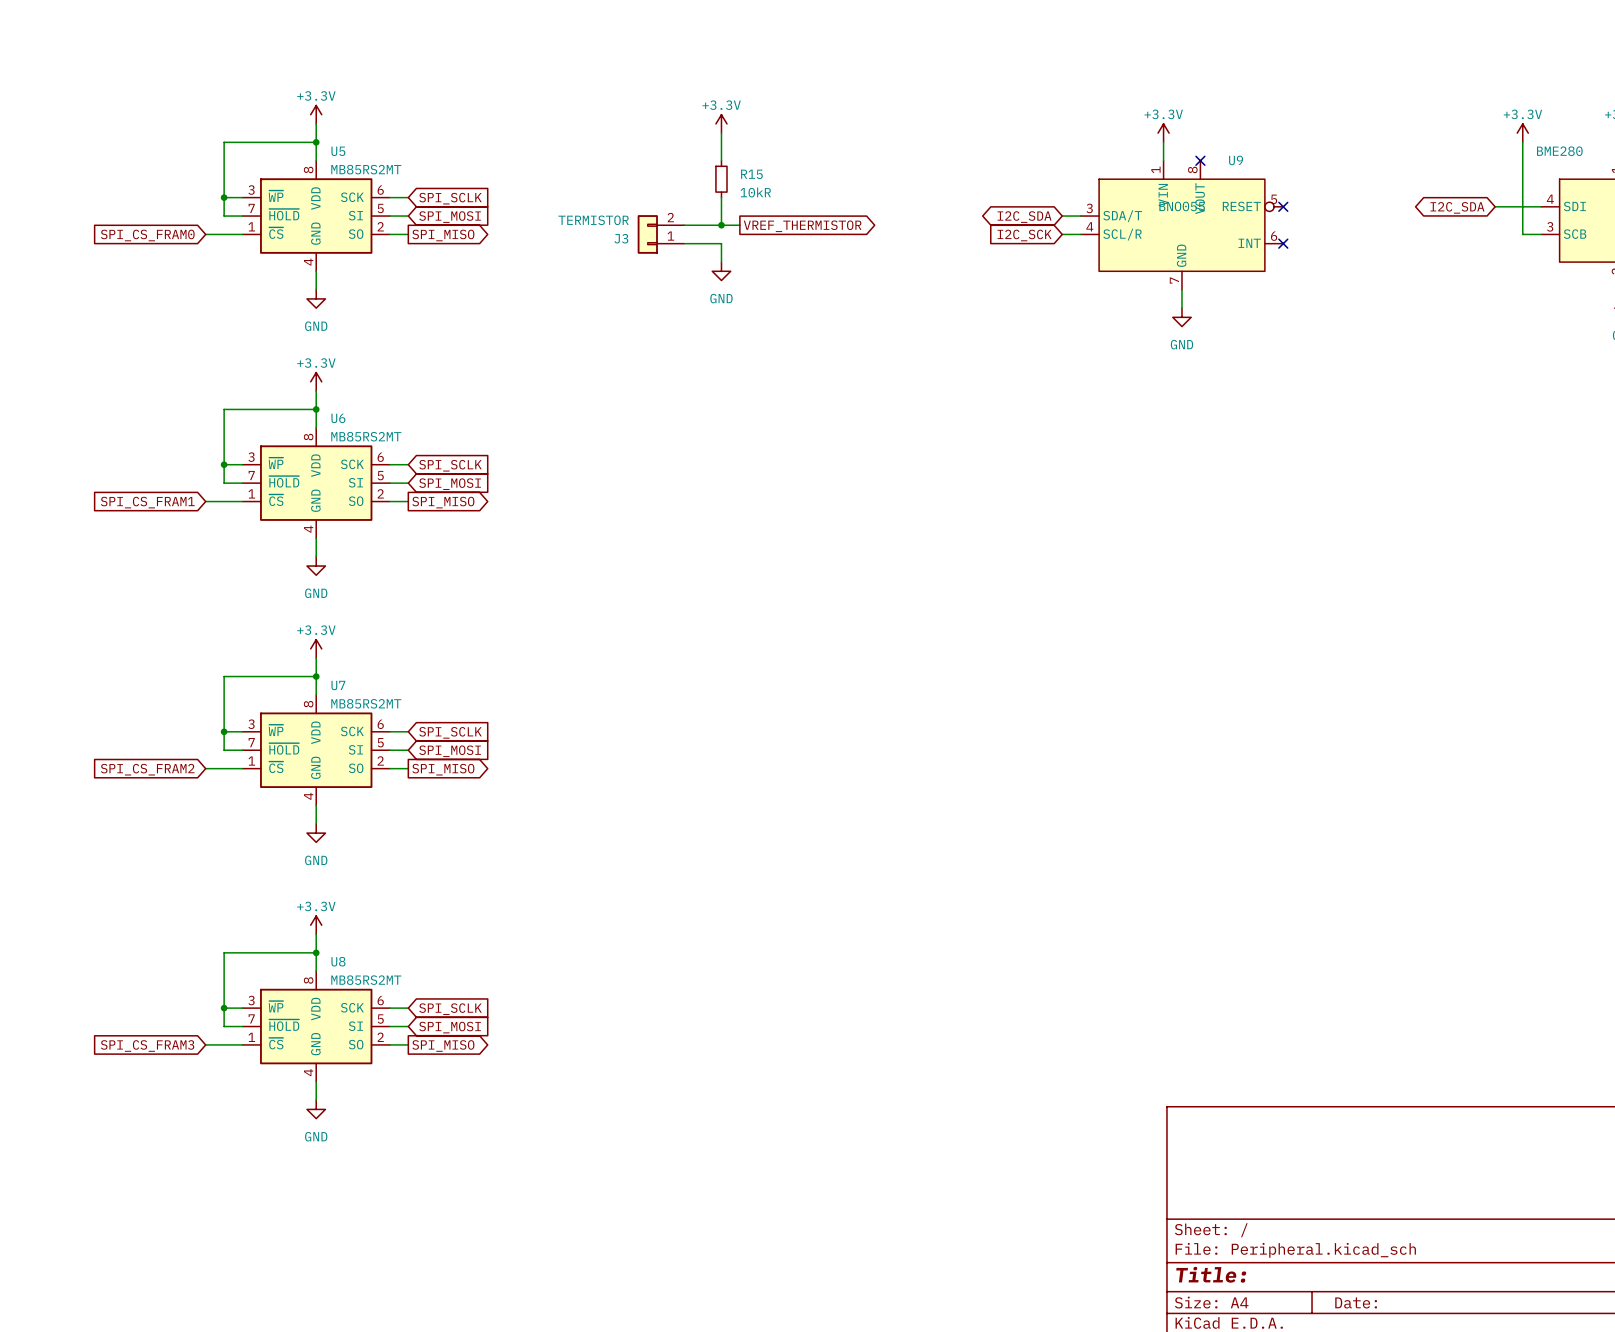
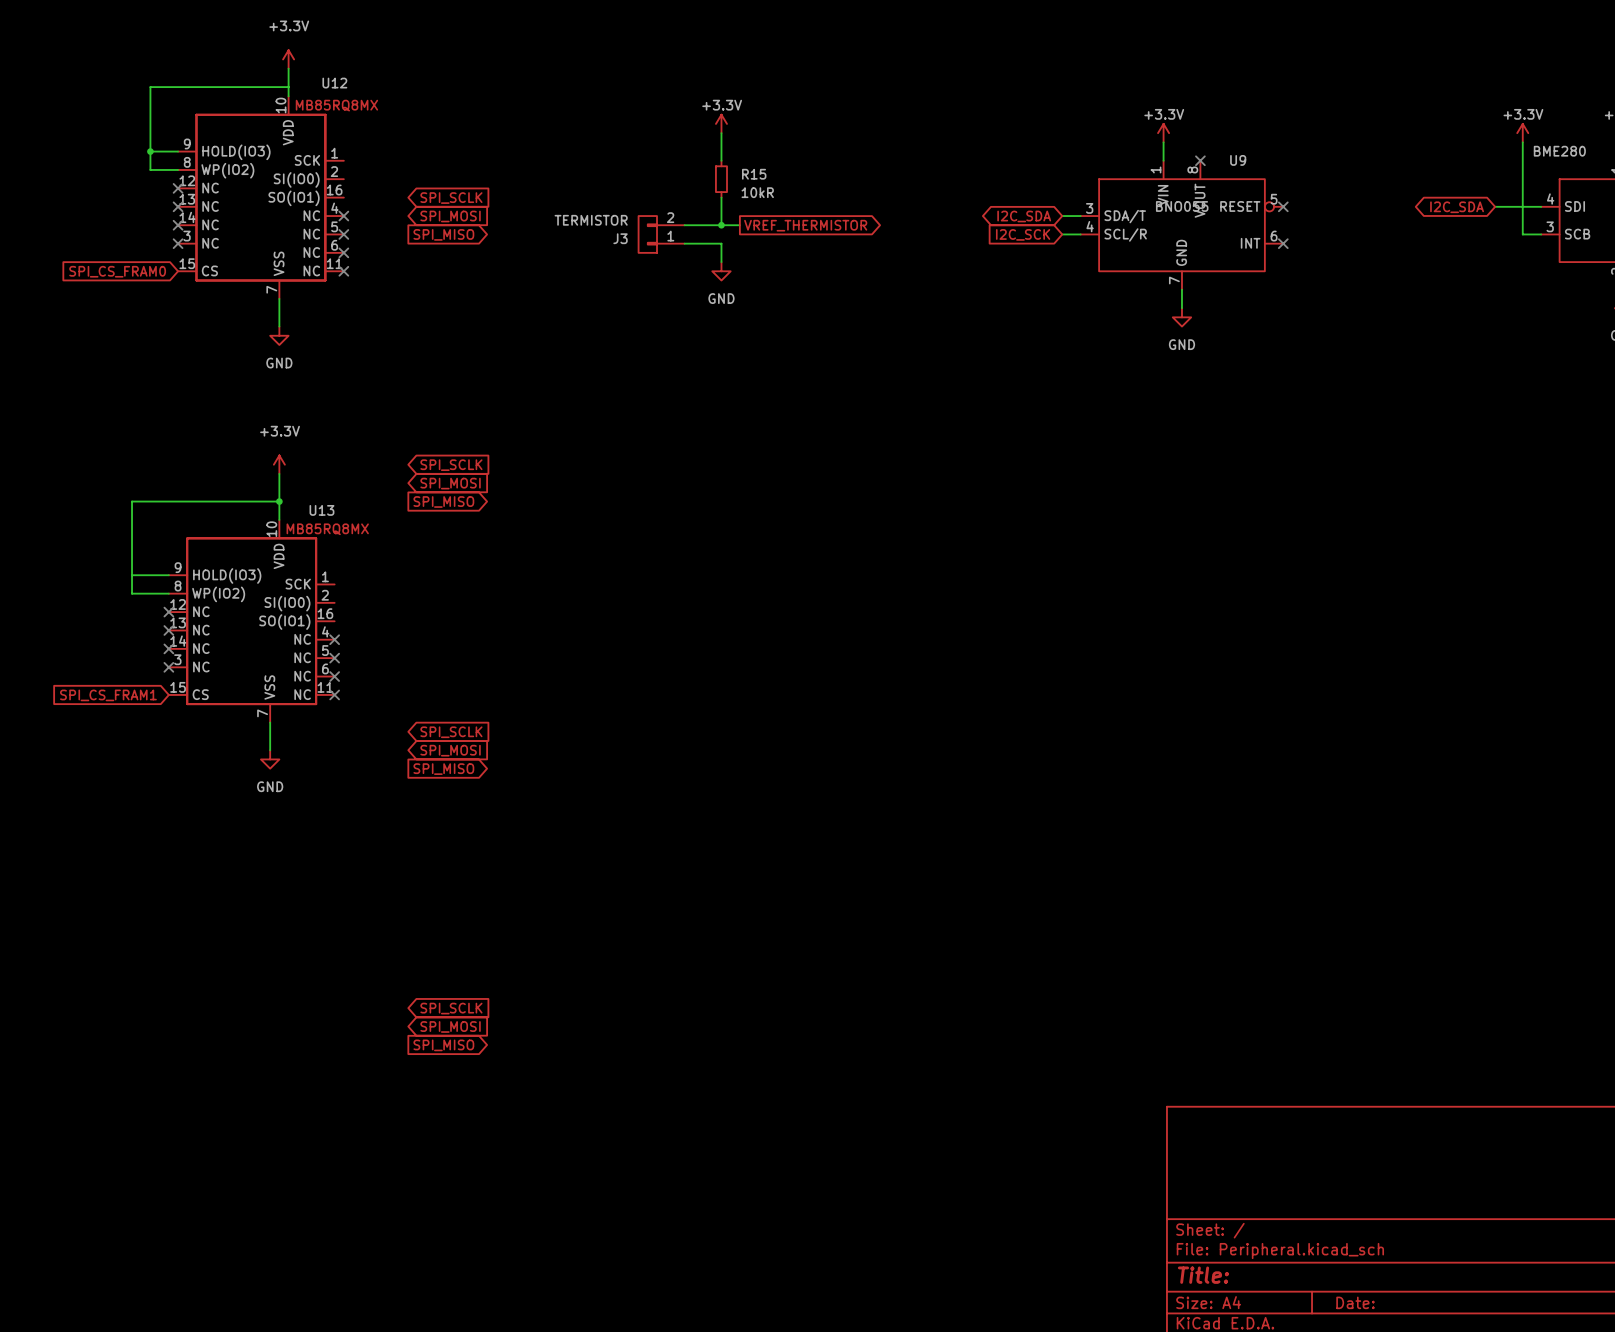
wire: none -> (288, 68) (288, 96)
wire: none -> (288, 87) (150, 87) (150, 169) (178, 169)
power symbol text position: +3.3V (316, 95) -> +3.3V (289, 25)
power symbol position: +3.3V (316, 114) -> +3.3V (288, 59)
wire: (316, 123) (316, 160) -> none
wire: (316, 142) (224, 142) (224, 216) (242, 216) -> none
junction: (316, 142) -> none
wire: none -> (150, 151) (178, 151)
junction: none -> (150, 151)
no-connect mark: none -> (178, 188)
wire: (224, 197) (242, 197) -> none
junction: (224, 197) -> none
U12: none -> (260, 197)
wire: (389, 197) (408, 197) -> none
no-connect mark: none -> (178, 206)
U5: MB85RS2MT (316, 216) -> none
no-connect mark: none -> (343, 216)
wire: (389, 216) (408, 216) -> none
no-connect mark: none -> (178, 225)
wire: (205, 234) (242, 234) -> none
no-connect mark: none -> (343, 234)
wire: (389, 234) (408, 234) -> none
global label position: SPI_CS_FRAM0 (147, 235) -> SPI_CS_FRAM0 (117, 271)
no-connect mark: none -> (178, 243)
no-connect mark: none -> (343, 252)
wire: (316, 271) (316, 289) -> none
no-connect mark: none -> (343, 271)
wire: none -> (279, 298) (279, 326)
power symbol position: GND (316, 298) -> GND (279, 335)
power symbol text position: +3.3V (316, 363) -> +3.3V (280, 431)
power symbol position: +3.3V (316, 381) -> +3.3V (279, 464)
wire: (316, 391) (316, 427) -> none
wire: (316, 409) (224, 409) (224, 483) (242, 483) -> none
junction: (316, 409) -> none
wire: (224, 464) (242, 464) -> none
junction: (224, 464) -> none
wire: (389, 464) (408, 464) -> none
U6: MB85RS2MT (316, 483) -> none
wire: (389, 483) (408, 483) -> none
wire: none -> (205, 501) (132, 501) (132, 593) (168, 593)
junction: none -> (279, 501)
wire: (389, 501) (408, 501) -> none
global label: SPI_CS_FRAM1 (147, 502) -> none
power symbol: GND (316, 566) -> none
wire: none -> (132, 575) (168, 575)
no-connect mark: none -> (168, 612)
U13: none -> (251, 621)
no-connect mark: none -> (168, 630)
no-connect mark: none -> (334, 639)
no-connect mark: none -> (168, 648)
power symbol: +3.3V (316, 648) -> none
no-connect mark: none -> (334, 658)
no-connect mark: none -> (168, 667)
wire: (316, 676) (224, 676) (224, 750) (242, 750) -> none
junction: (316, 676) -> none
no-connect mark: none -> (334, 676)
no-connect mark: none -> (334, 694)
global label: none -> SPI_CS_FRAM1 (108, 695)
wire: (224, 731) (242, 731) -> none
junction: (224, 731) -> none
wire: (389, 731) (408, 731) -> none
U7: MB85RS2MT (316, 750) -> none
wire: (389, 750) (408, 750) -> none
wire: (205, 768) (242, 768) -> none
wire: (389, 768) (408, 768) -> none
global label: SPI_CS_FRAM2 (147, 769) -> none
wire: (316, 805) (316, 823) -> none
power symbol position: GND (316, 833) -> GND (270, 759)
power symbol: +3.3V (316, 925) -> none
wire: (316, 934) (316, 971) -> none
wire: (316, 952) (224, 952) (224, 1026) (242, 1026) -> none
junction: (316, 952) -> none
wire: (224, 1008) (242, 1008) -> none
junction: (224, 1008) -> none
wire: (389, 1008) (408, 1008) -> none
U8: MB85RS2MT (316, 1026) -> none
wire: (389, 1026) (408, 1026) -> none
wire: (205, 1044) (242, 1044) -> none
wire: (389, 1044) (408, 1044) -> none
global label: SPI_CS_FRAM3 (147, 1045) -> none
wire: (316, 1081) (316, 1100) -> none
power symbol: GND (316, 1109) -> none

